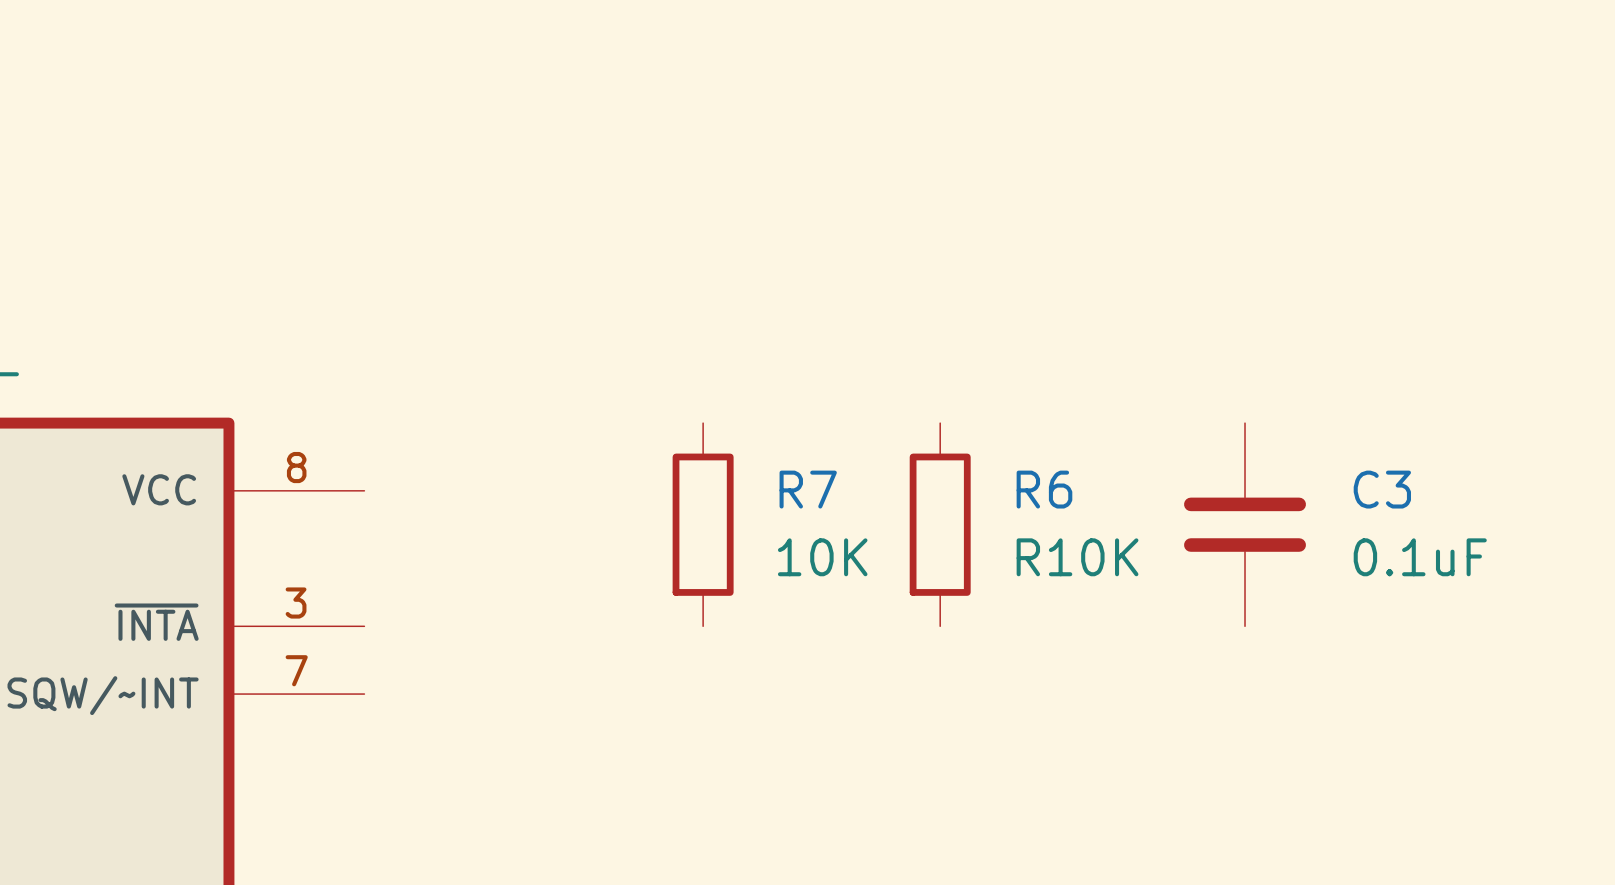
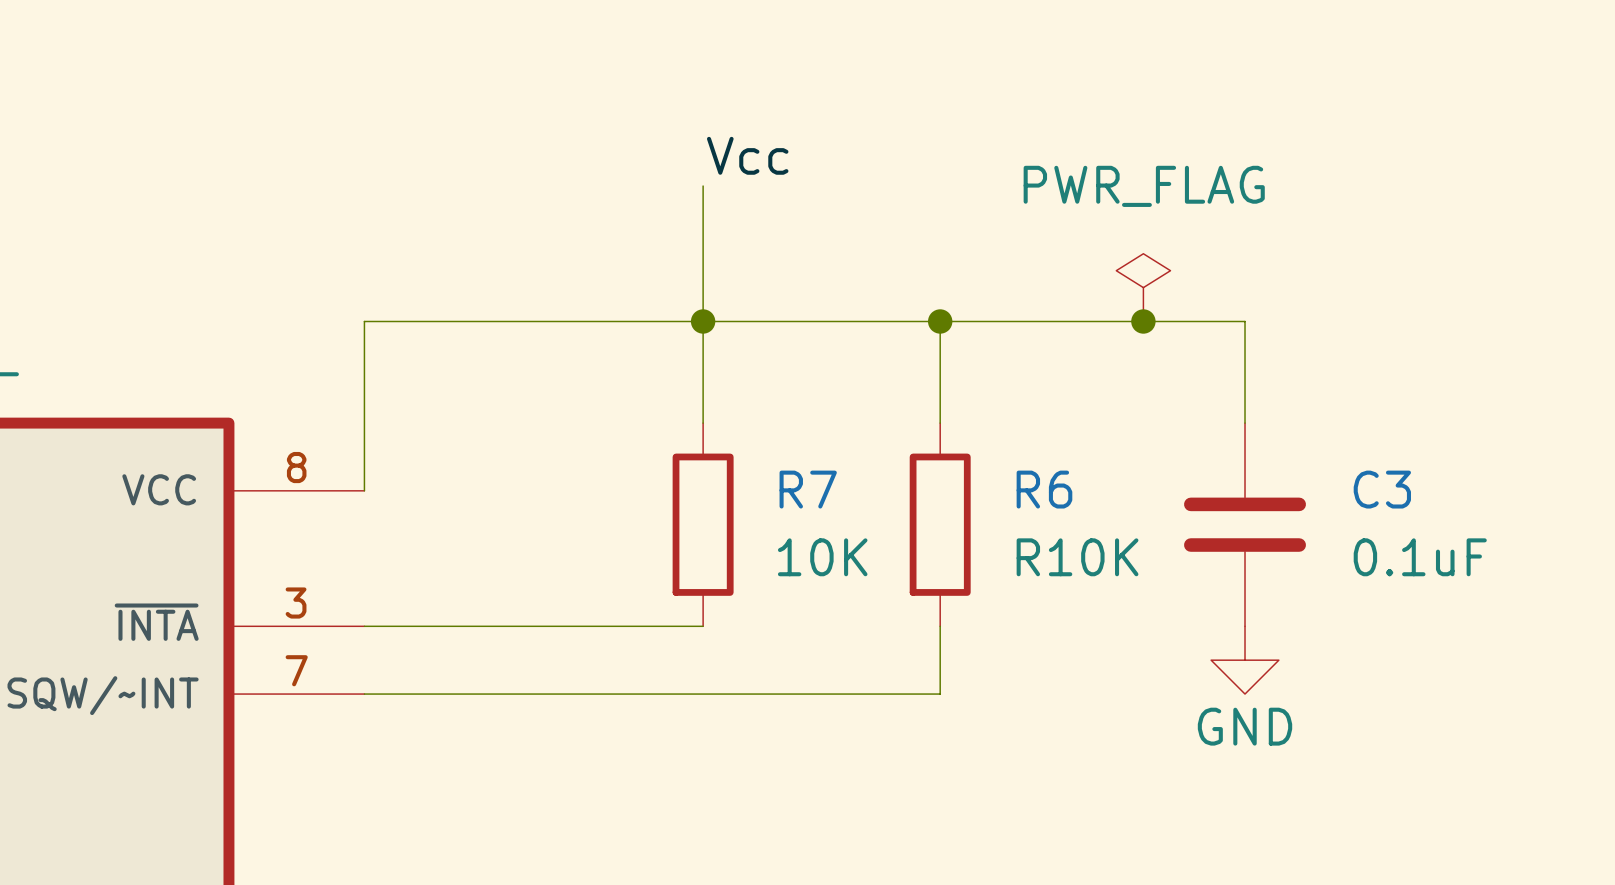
label: none -> Vcc (747, 155)
wire: none -> (703, 186) (703, 423)
power symbol: none -> PWR_FLAG (1143, 287)
junction: none -> (703, 321)
wire: none -> (940, 321) (940, 423)
junction: none -> (940, 321)
junction: none -> (1143, 321)
wire: none -> (1245, 423) (1245, 321) (364, 321) (364, 490)
wire: none -> (364, 626) (703, 626)
wire: none -> (940, 626) (940, 694) (364, 694)
power symbol: none -> GND (1245, 660)

